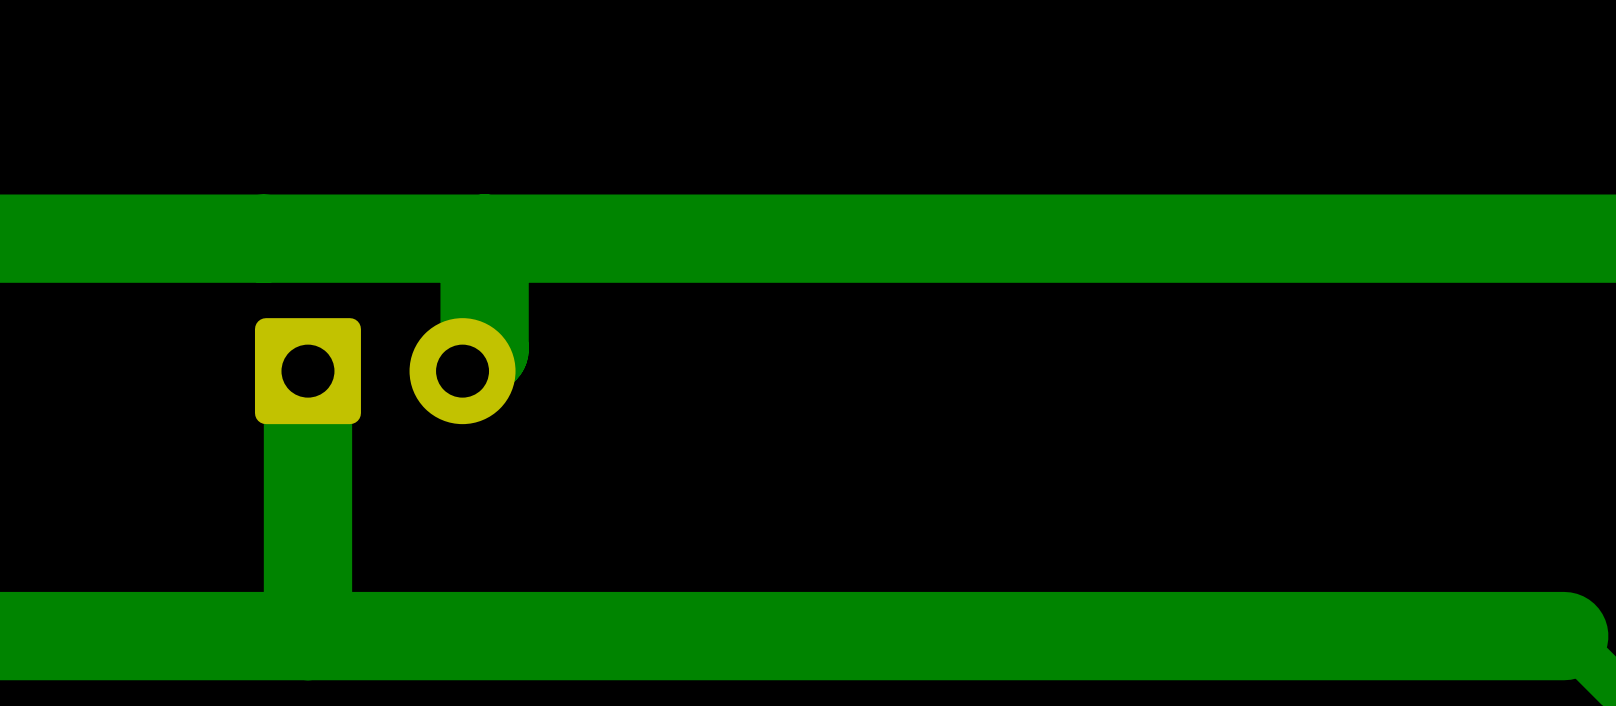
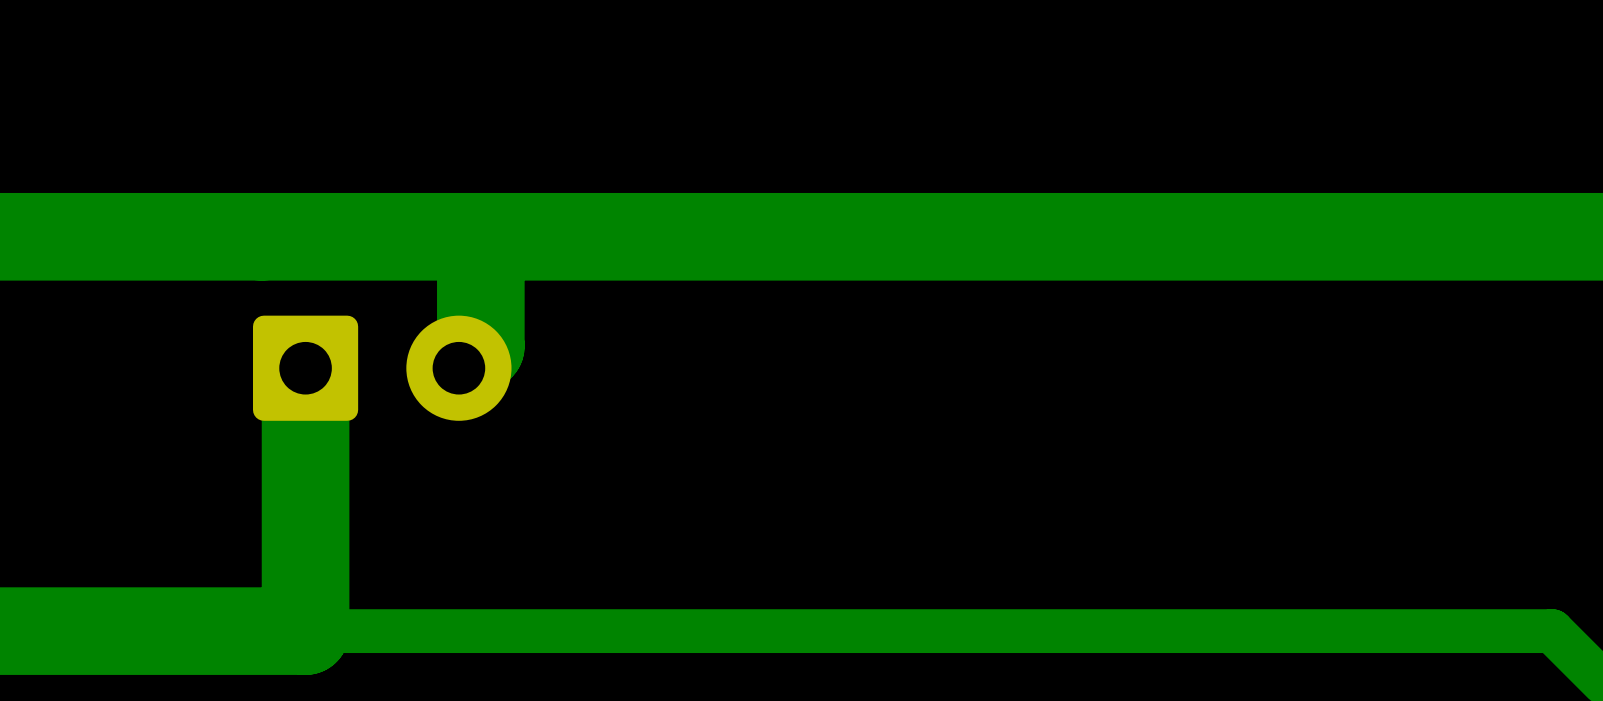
track width: thick (1564, 636) (307, 636) -> thin (1552, 631) (305, 631)

